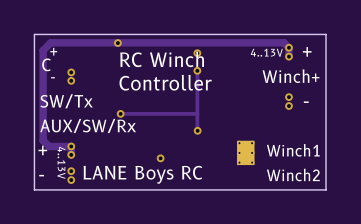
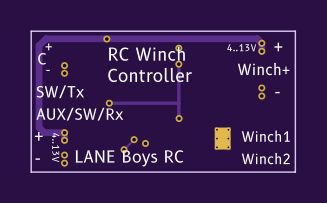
track: none -> (134, 139) (124, 149)
via: none -> (134, 139)
via: none -> (124, 149)

